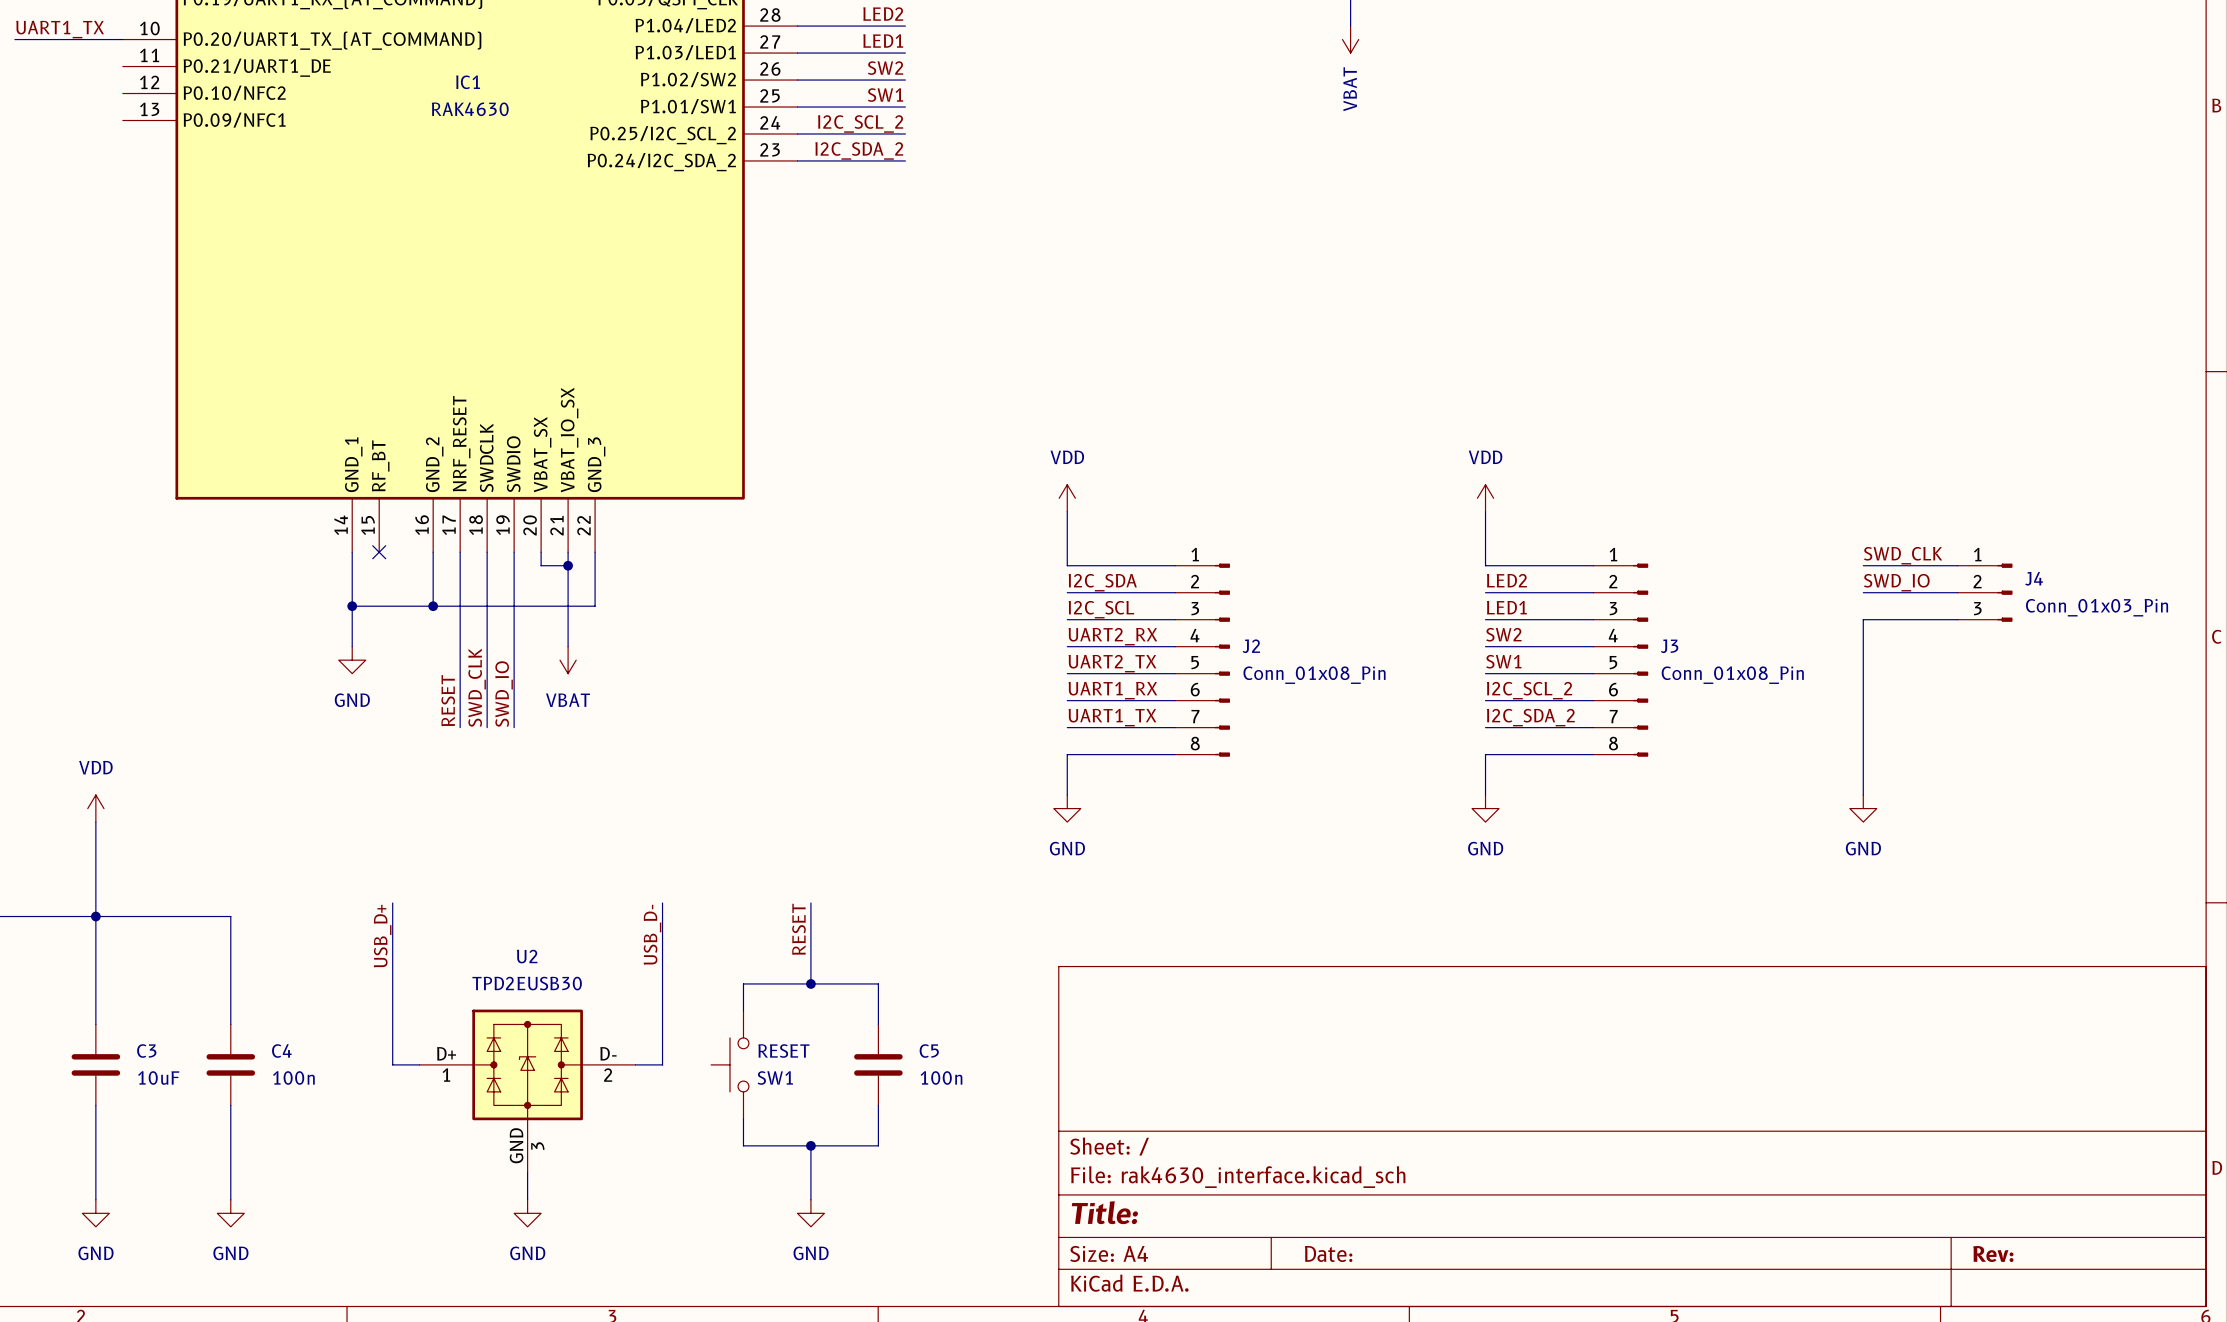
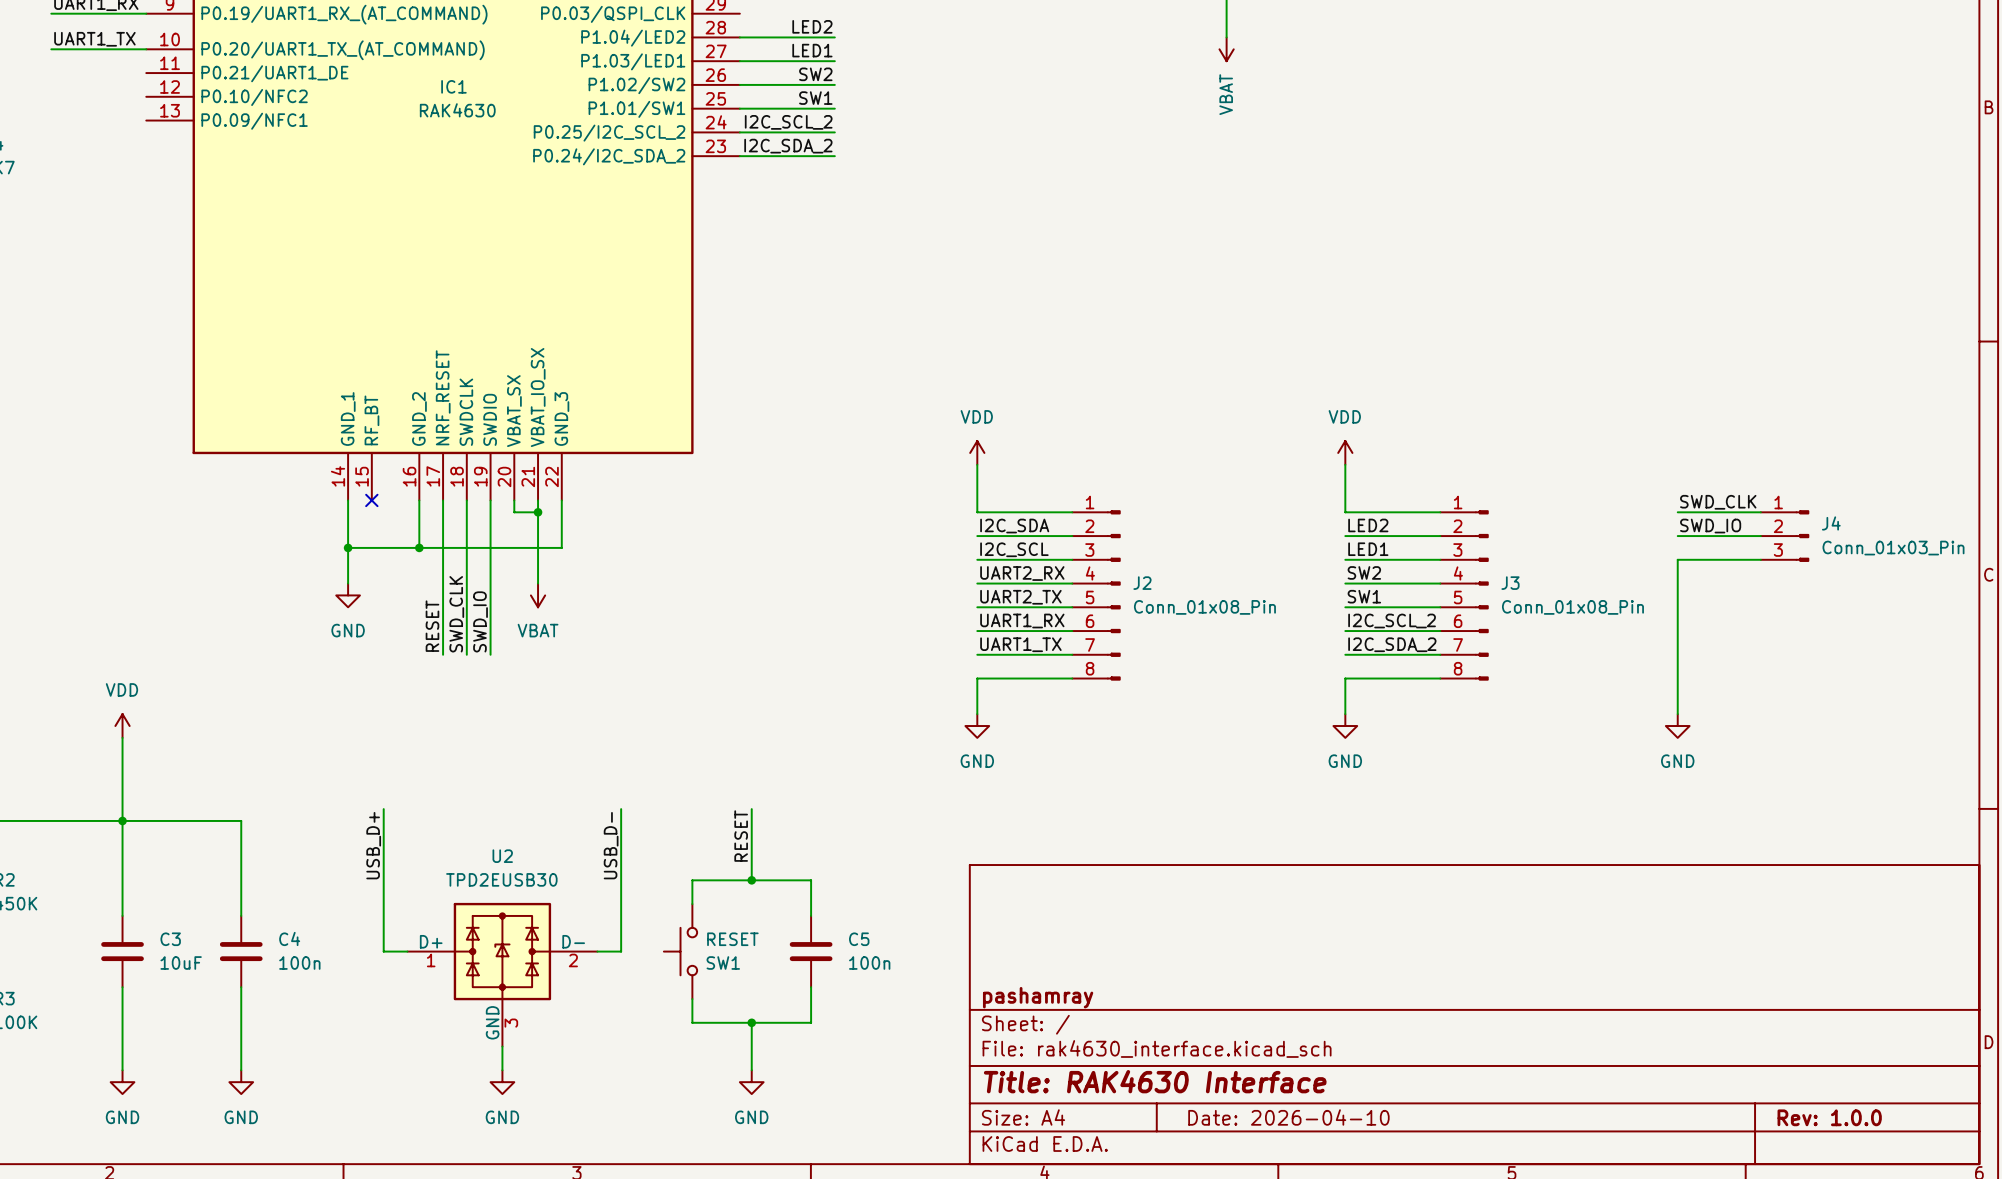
title block: none -> pashamray (1038, 997)
title block: Title: (1104, 1212) -> Title: RAK4630 Interface (1155, 1081)
title block: Date: (1328, 1253) -> Date: 2026-04-10 (1288, 1117)
title block: Rev: (1993, 1254) -> Rev: 1.0.0 (1829, 1117)

